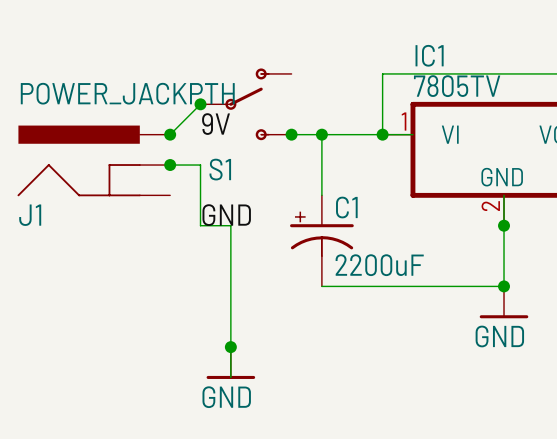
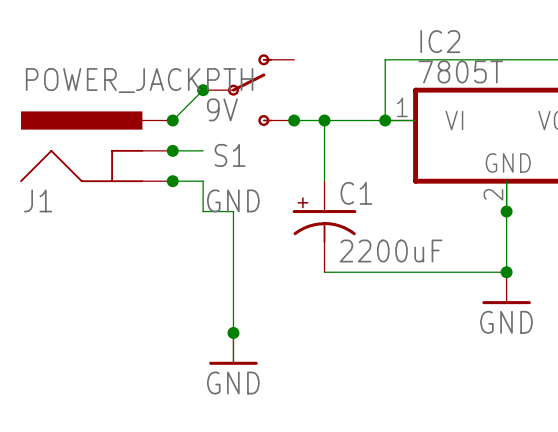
IC1 name: IC1 (429, 55) -> IC2 (440, 41)
IC1 value: 7805TV (457, 86) -> 7805T (460, 71)
wire: (200, 165) (200, 195) -> (172, 181) (203, 181)
junction: none -> (172, 181)

